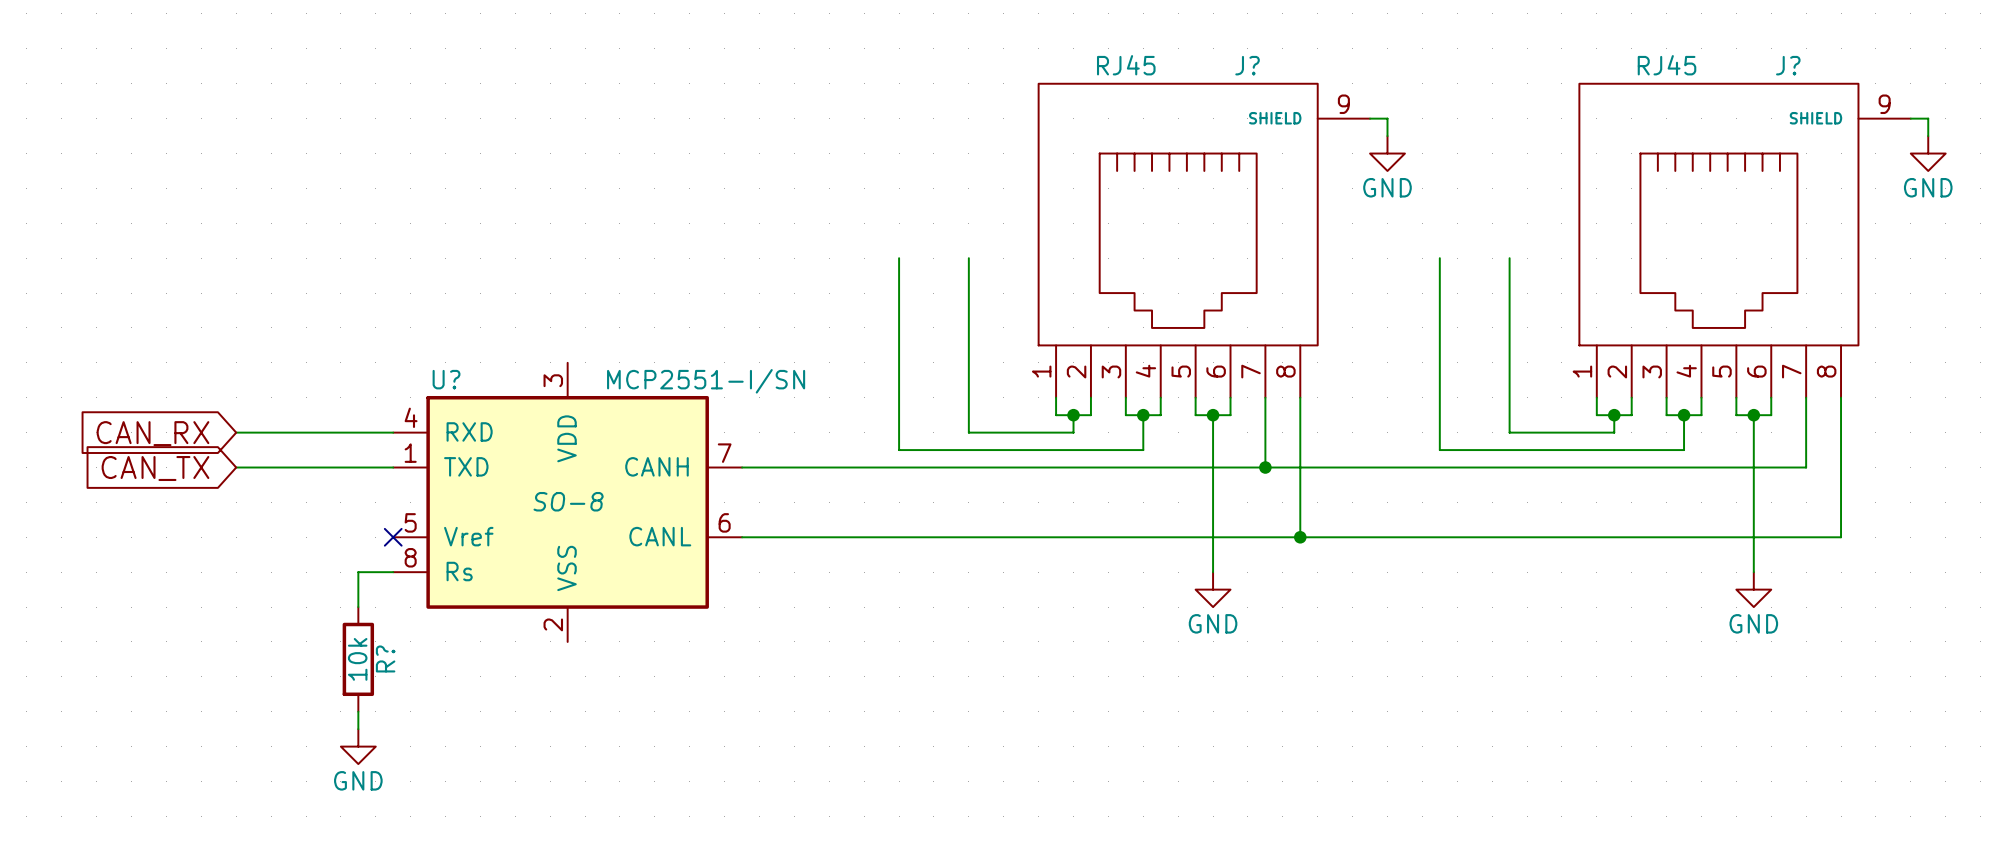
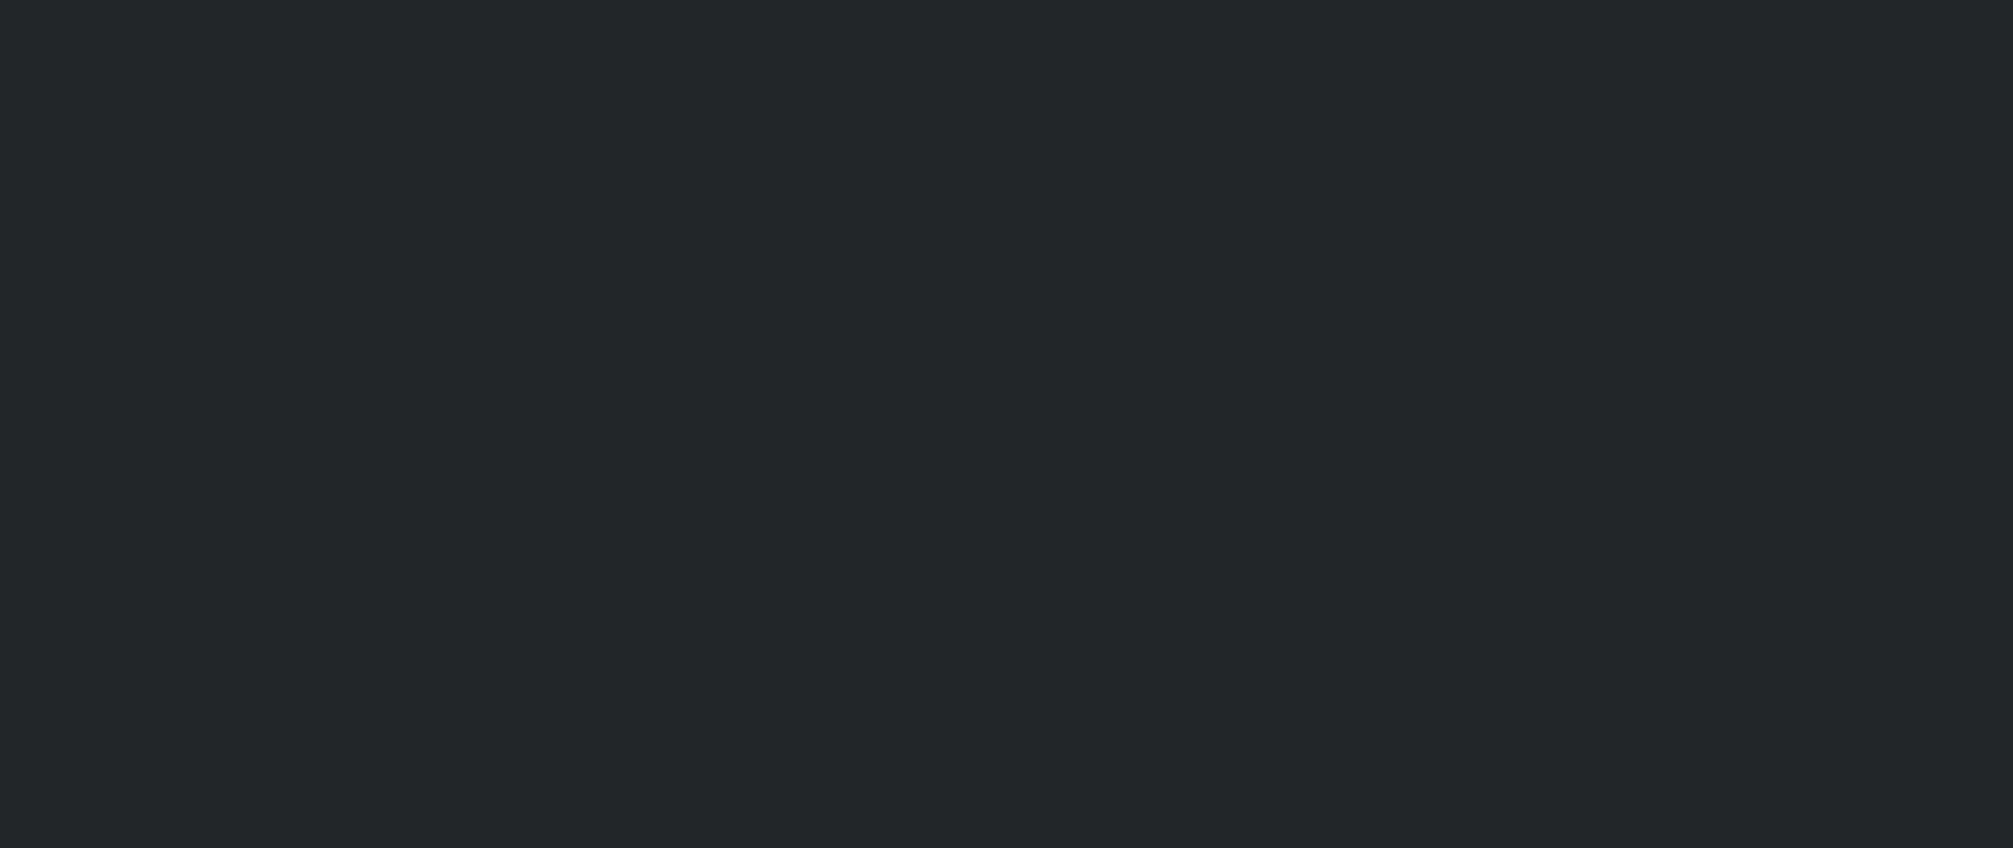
wire: (1370, 118) (1387, 118) (1387, 136) -> none
wire: (1910, 118) (1928, 118) (1928, 136) -> none
power symbol: GND (1387, 153) -> none
power symbol: GND (1928, 153) -> none
J?: RJ45 (1204, 240) -> none
J?: RJ45 (1745, 240) -> none
wire: (899, 258) (899, 450) (1143, 450) (1143, 415) -> none
wire: (968, 258) (968, 432) (1073, 432) (1073, 415) -> none
wire: (1439, 258) (1439, 450) (1684, 450) (1684, 415) -> none
wire: (1509, 258) (1509, 432) (1614, 432) (1614, 415) -> none
wire: (1056, 397) (1056, 415) (1090, 415) (1090, 397) -> none
wire: (1125, 397) (1125, 415) (1160, 415) (1160, 397) -> none
wire: (1195, 397) (1195, 415) (1230, 415) (1230, 397) -> none
wire: (1265, 397) (1265, 467) -> none
wire: (1300, 397) (1300, 537) -> none
wire: (1596, 397) (1596, 415) (1631, 415) (1631, 397) -> none
wire: (1666, 397) (1666, 415) (1701, 415) (1701, 397) -> none
wire: (1736, 397) (1736, 415) (1771, 415) (1771, 397) -> none
wire: (1806, 397) (1806, 467) (742, 467) -> none
wire: (1841, 397) (1841, 537) (742, 537) -> none
junction: (1073, 415) -> none
junction: (1143, 415) -> none
wire: (1213, 415) (1213, 572) -> none
junction: (1213, 415) -> none
junction: (1614, 415) -> none
junction: (1684, 415) -> none
wire: (1753, 415) (1753, 572) -> none
junction: (1753, 415) -> none
wire: (236, 432) (393, 432) -> none
global label: CAN_RX (153, 433) -> none
wire: (236, 467) (393, 467) -> none
junction: (1265, 467) -> none
global label: CAN_TX (155, 468) -> none
U?: MCP2551-I/SN (567, 502) -> none
no-connect mark: (393, 537) -> none
junction: (1300, 537) -> none
wire: (393, 572) (358, 572) (358, 607) -> none
power symbol: GND (1213, 589) -> none
power symbol: GND (1753, 589) -> none
R?: 10k (358, 659) -> none
wire: (358, 711) (358, 729) -> none
power symbol: GND (358, 746) -> none

